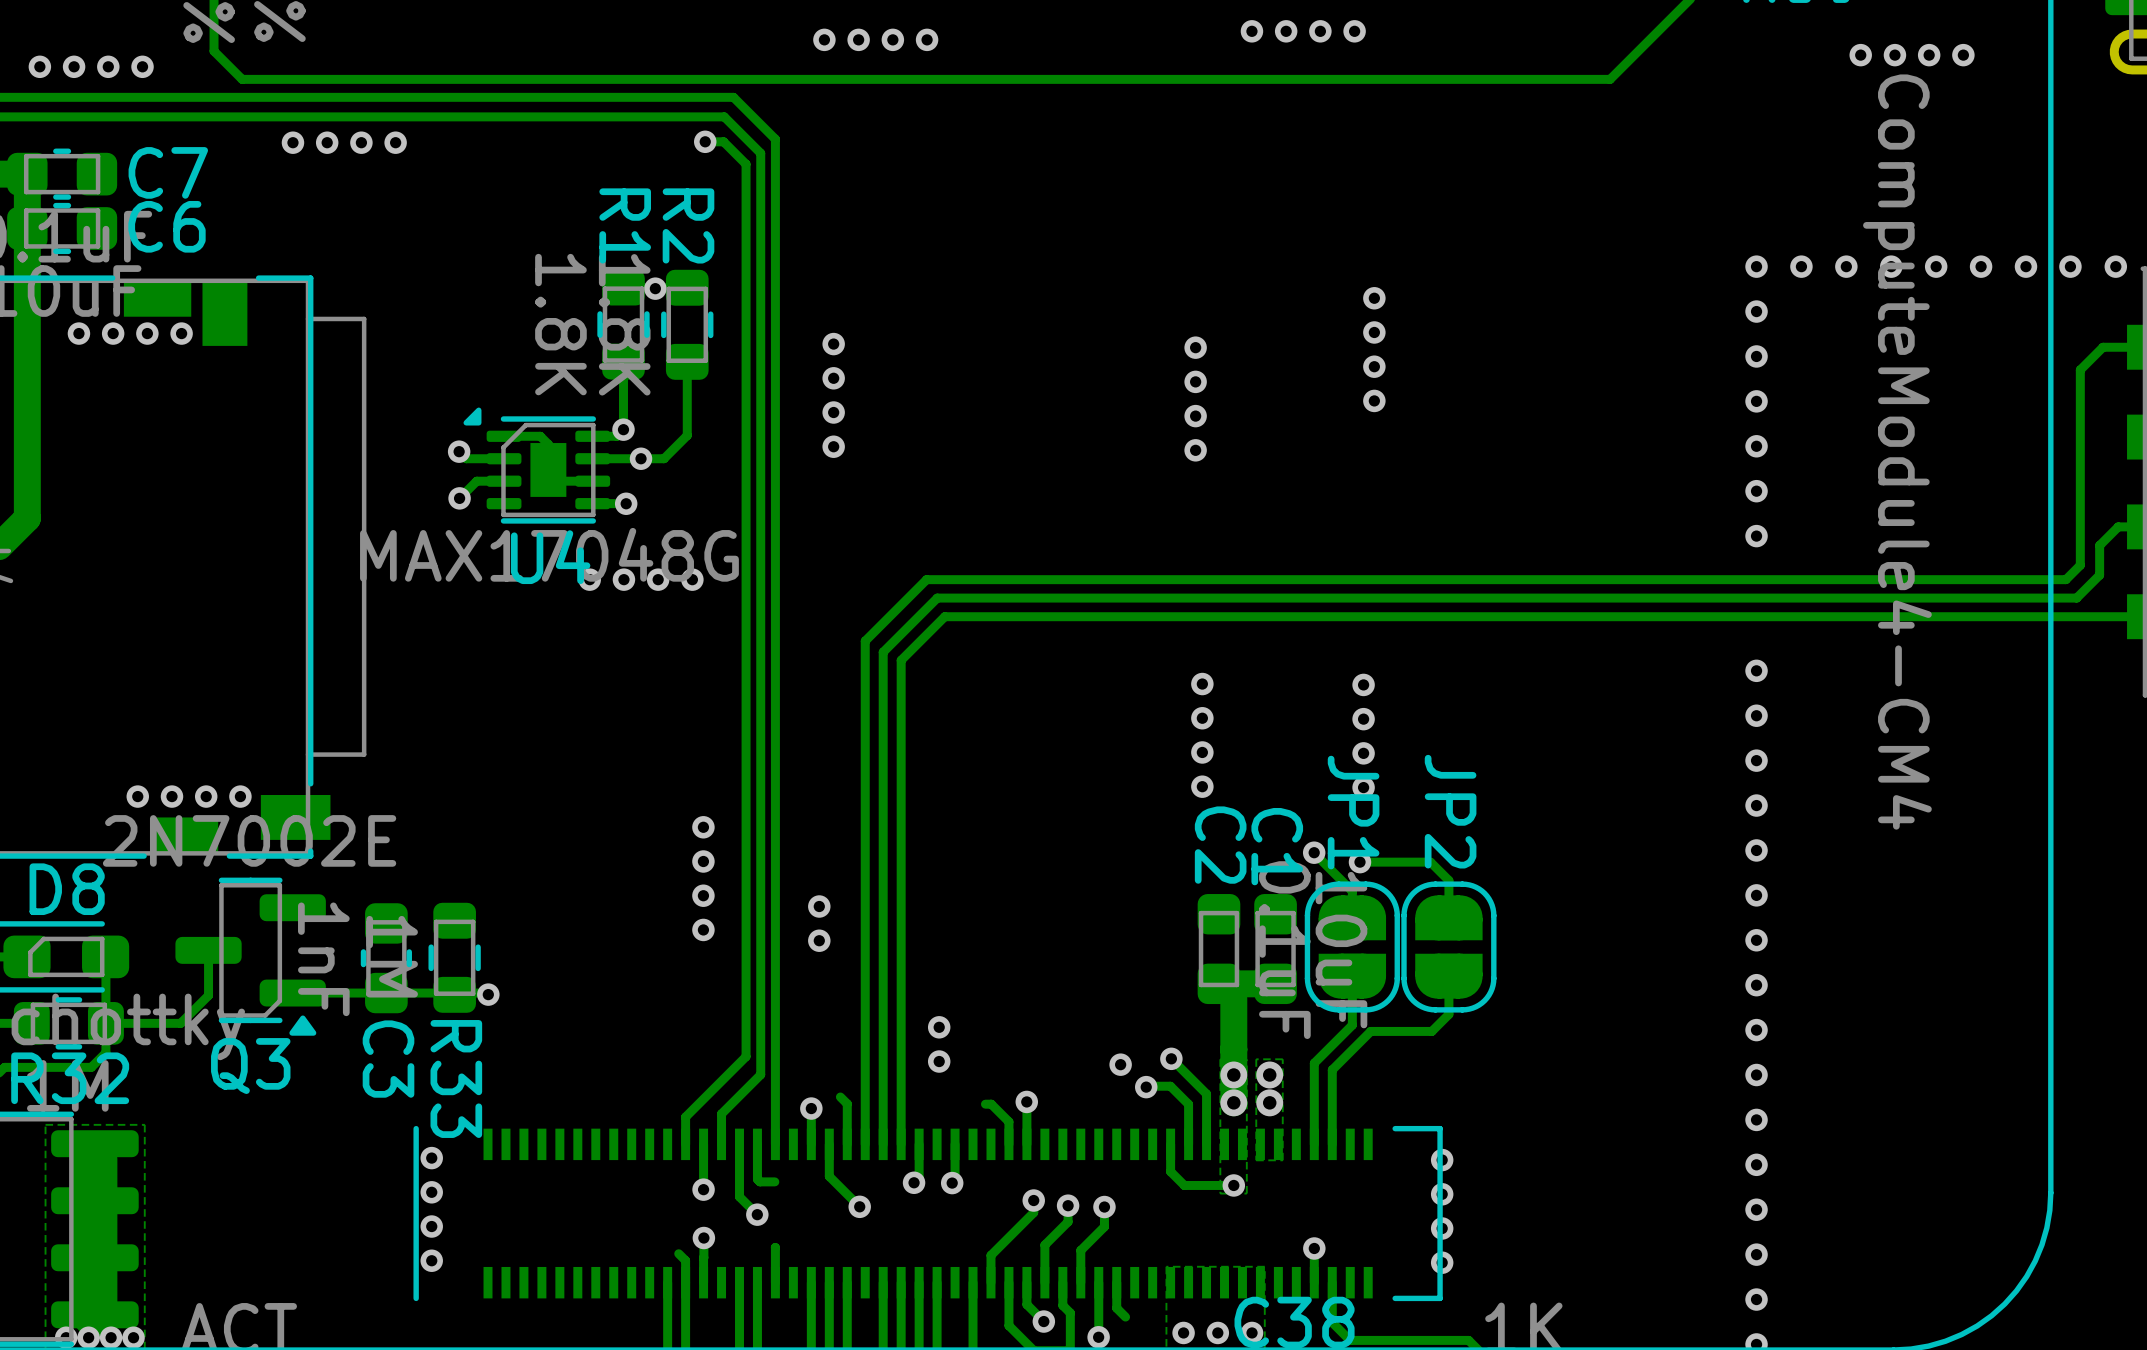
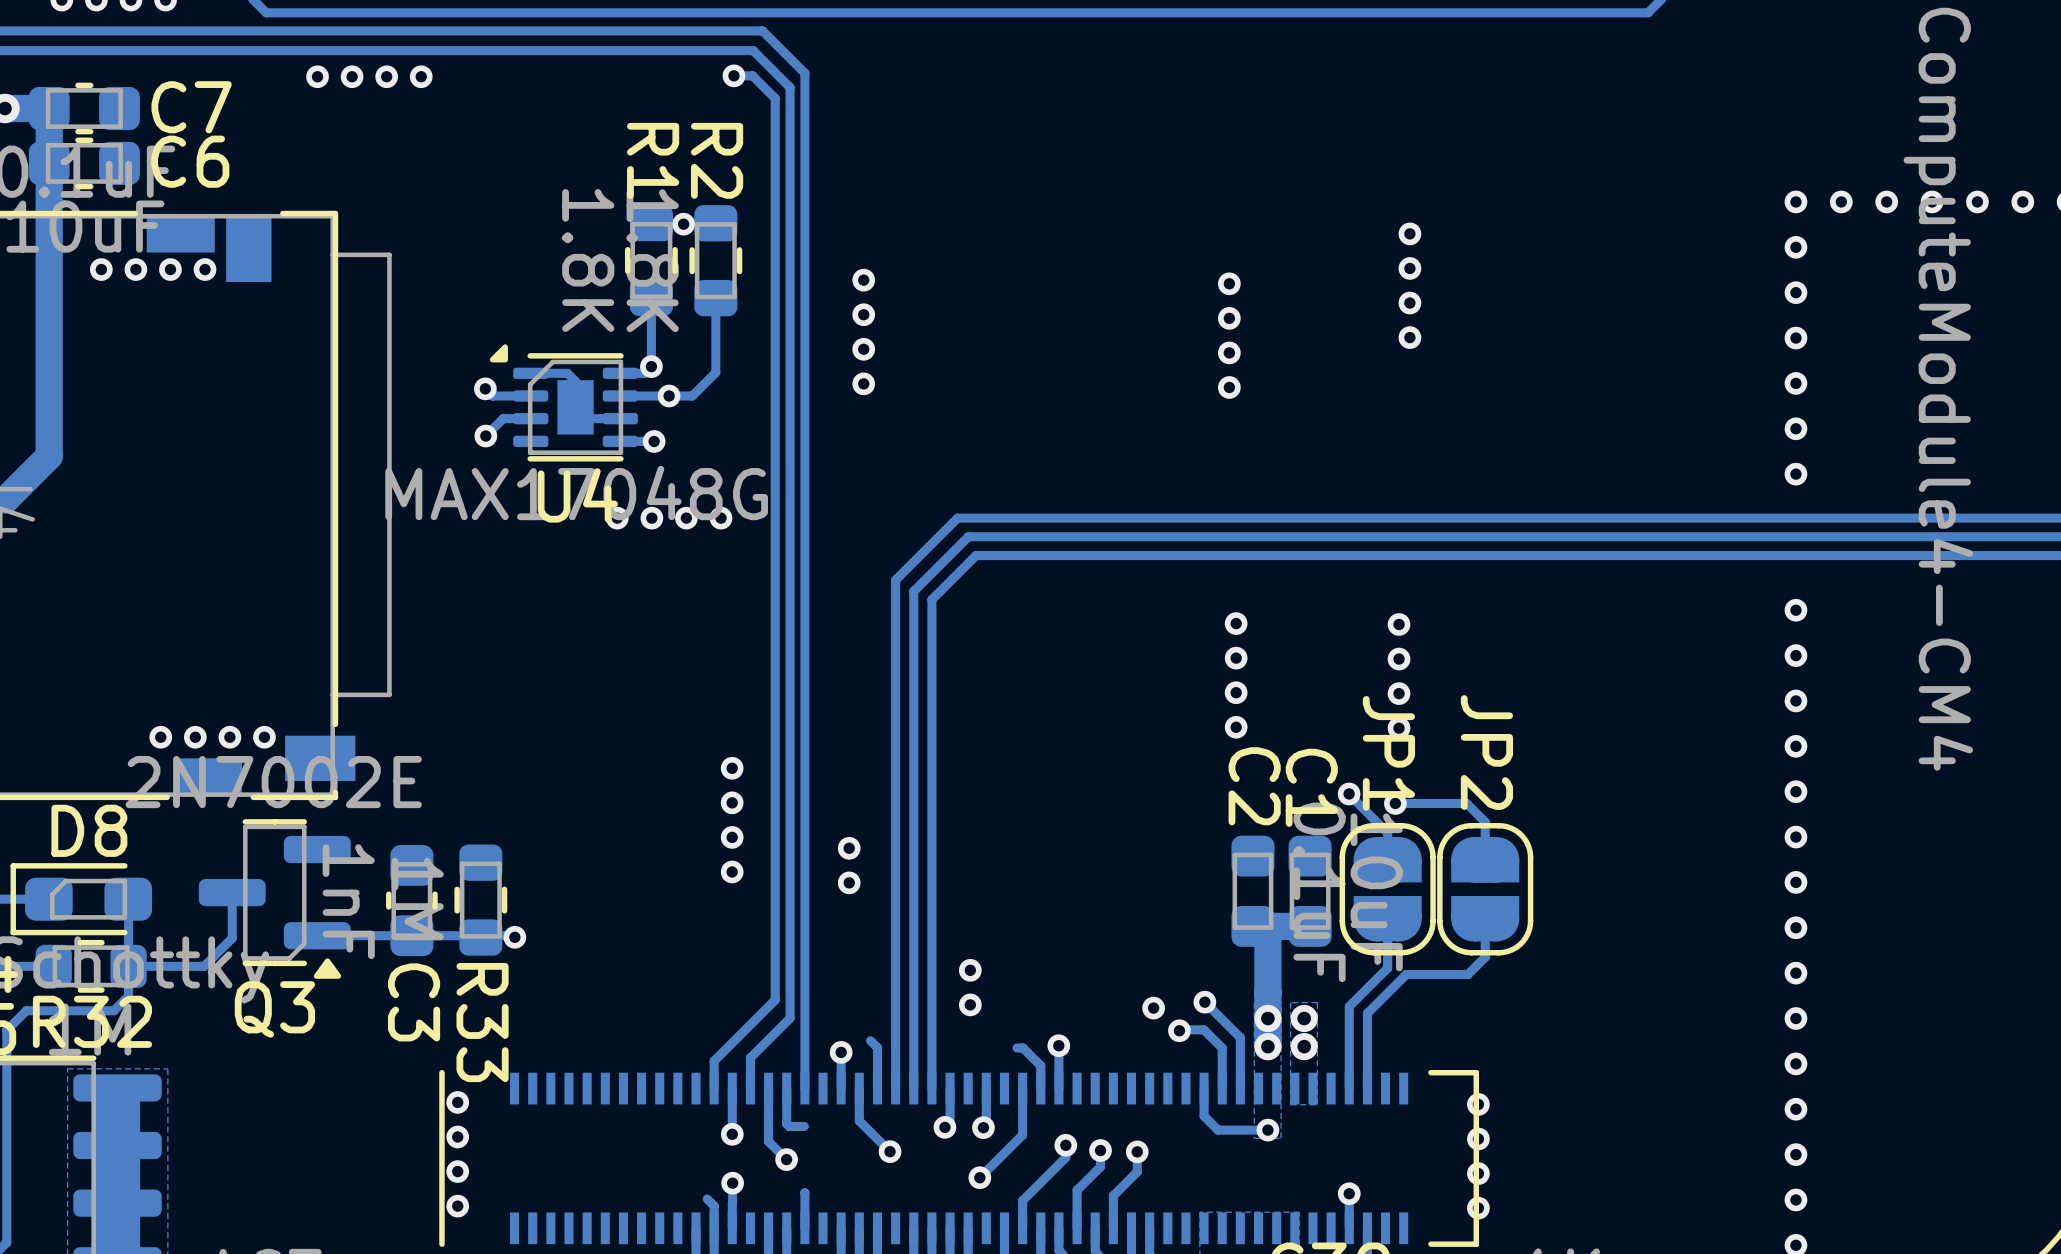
track: none -> (1022, 1088) (1022, 1134) (979, 1177)
via: none -> (979, 1177)

